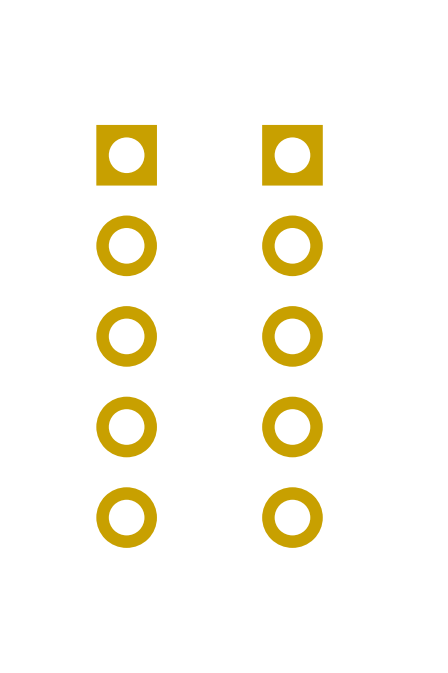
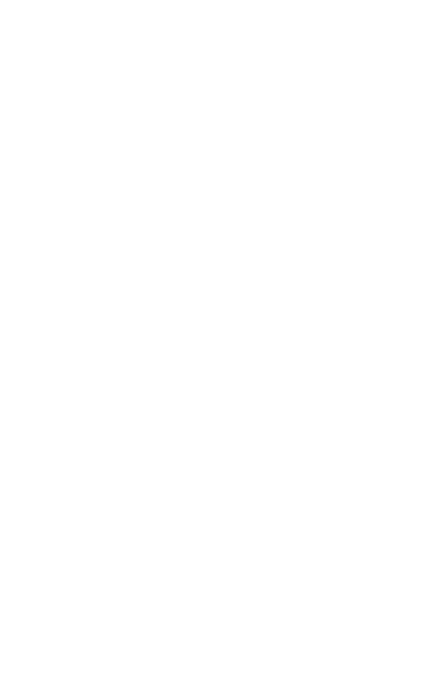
part: (126, 336) -> none
part: (292, 336) -> none

